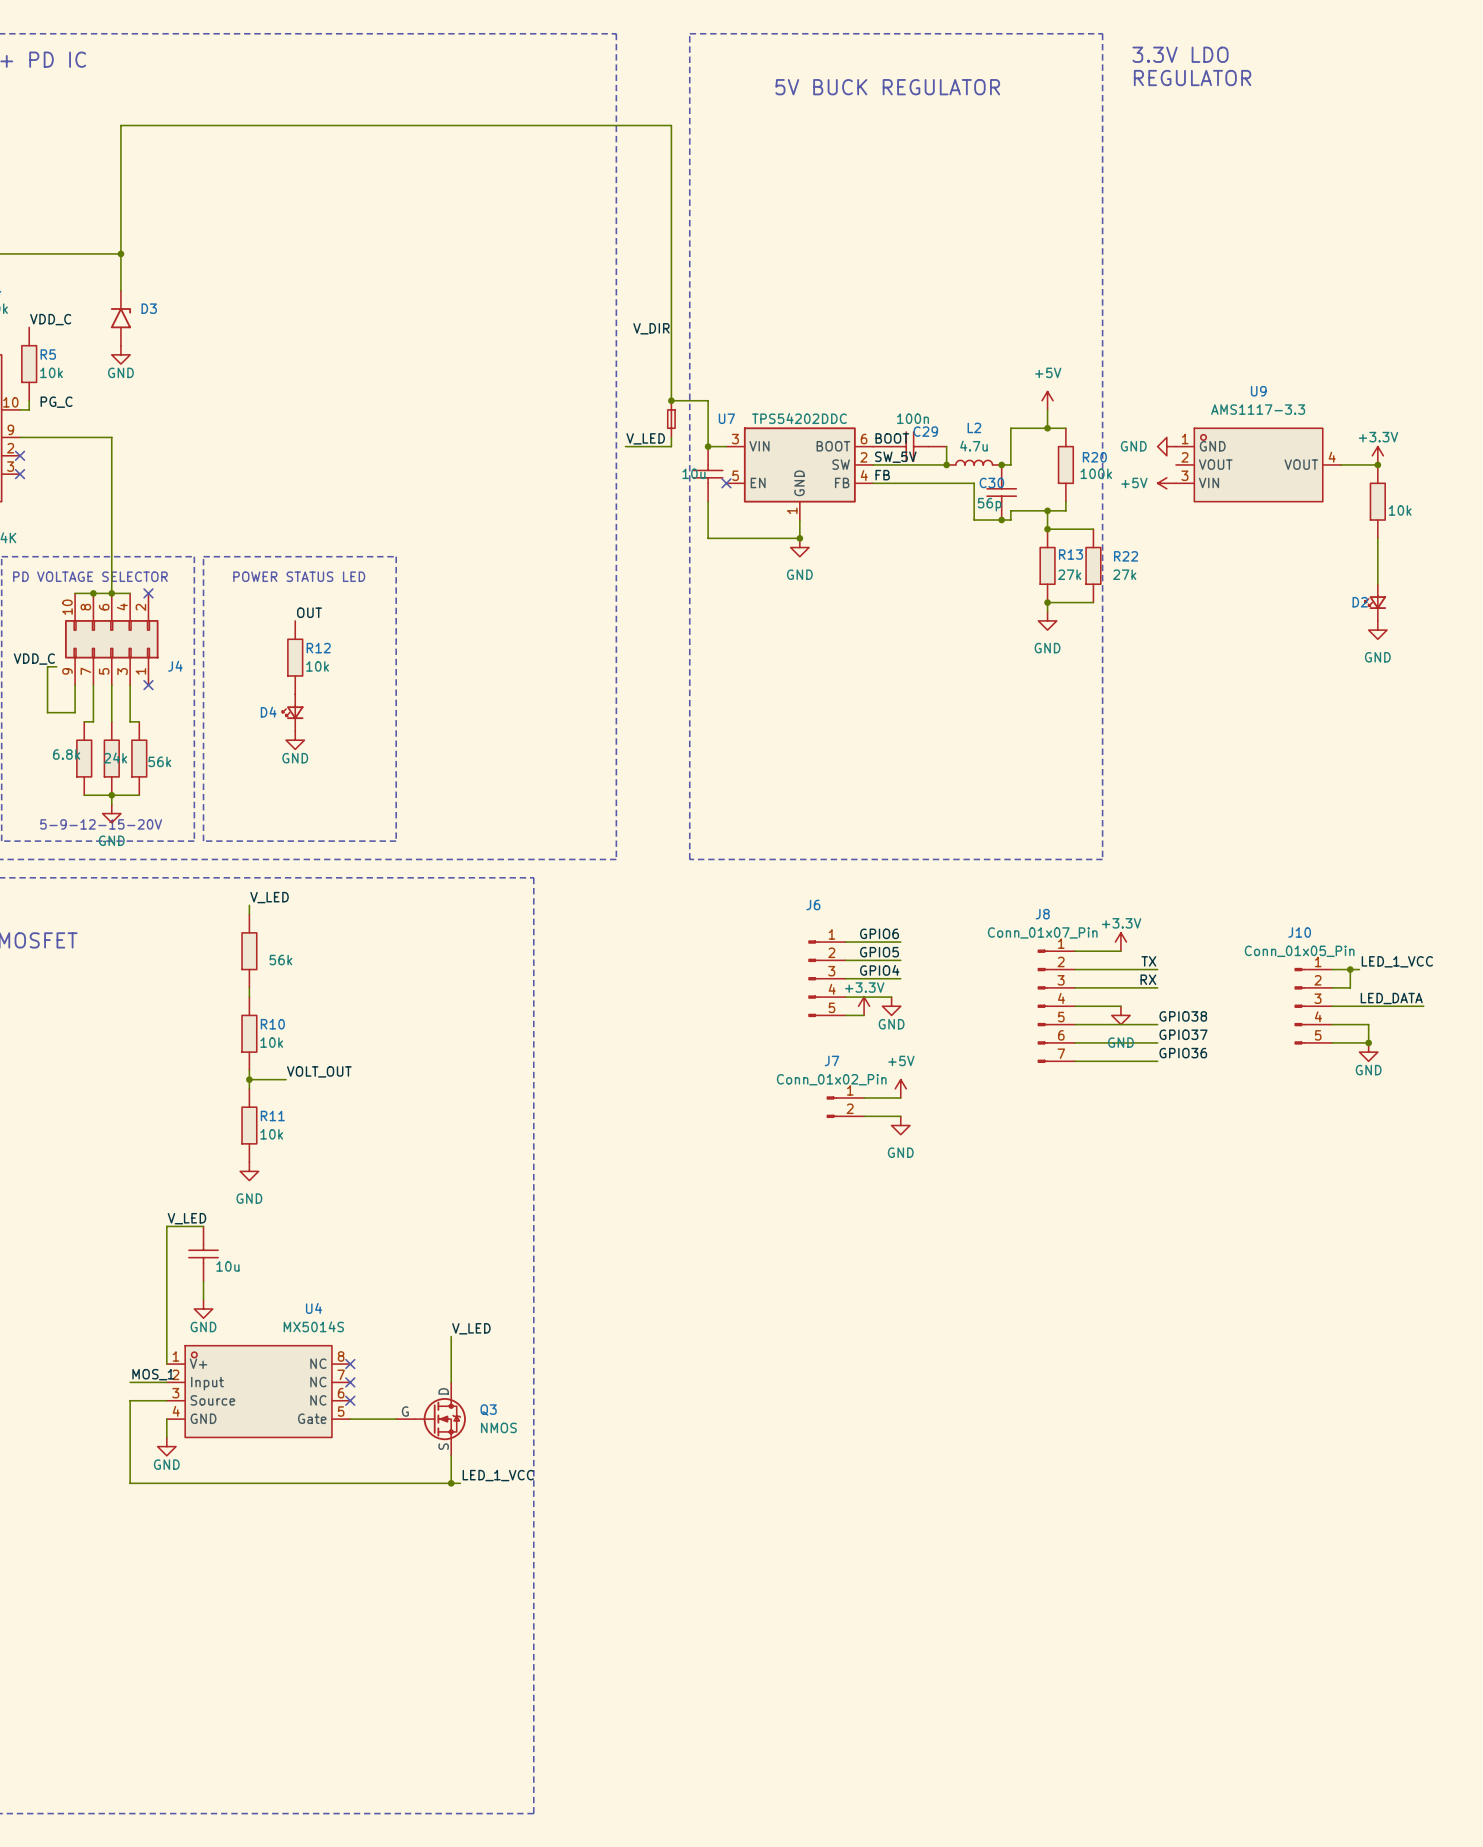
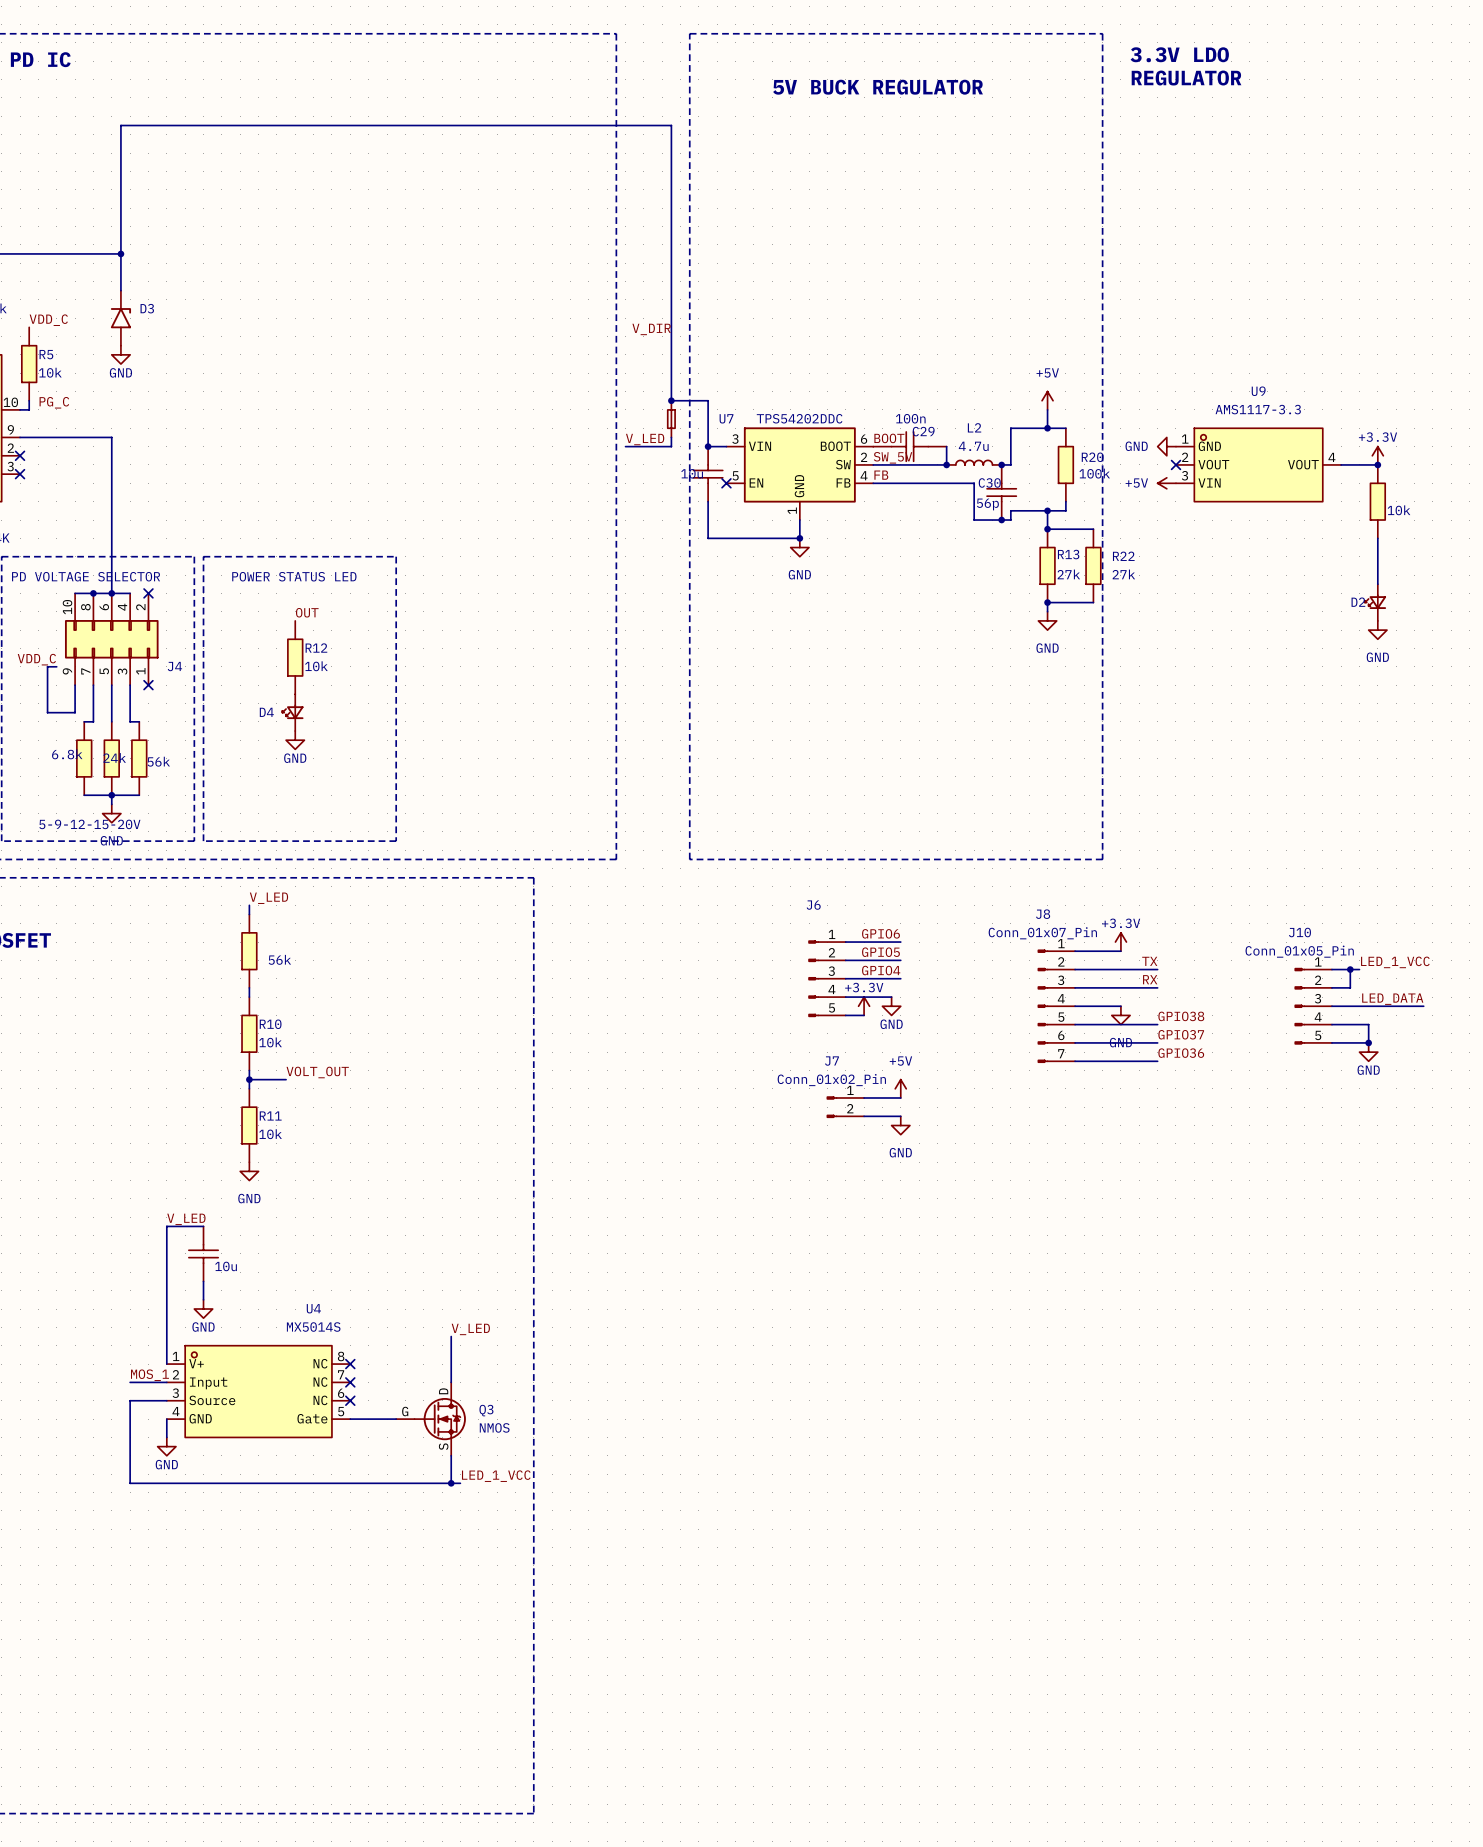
no-connect mark: none -> (1175, 464)

